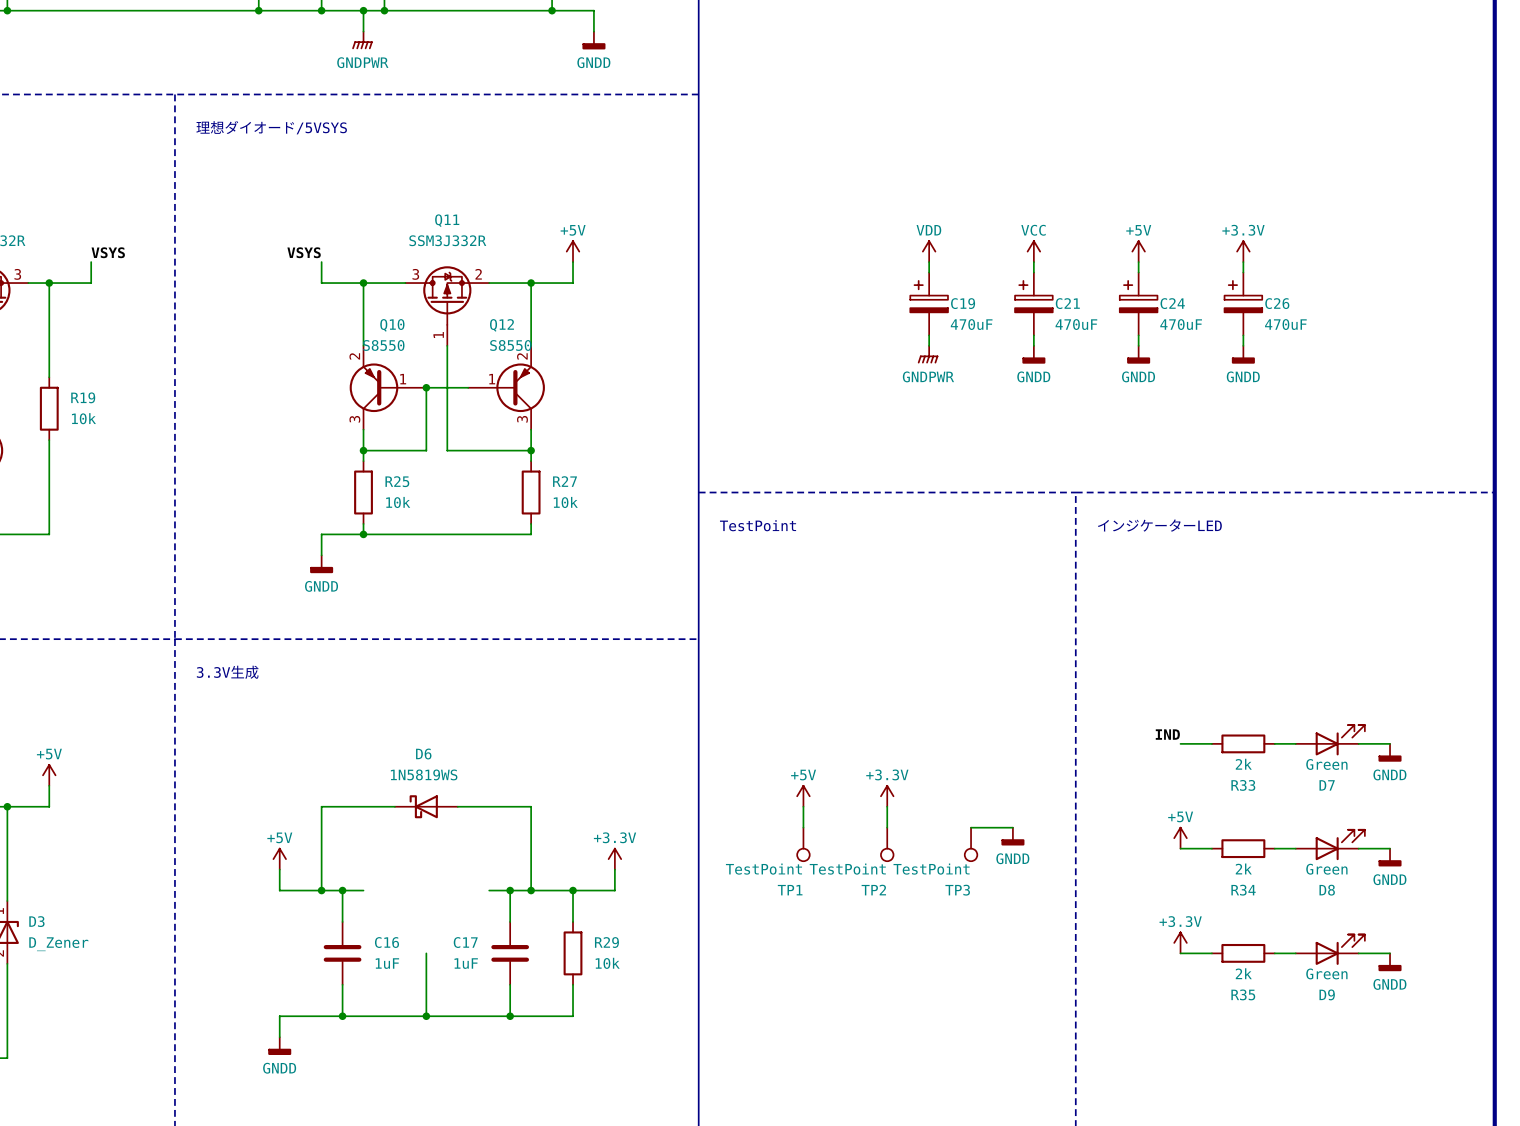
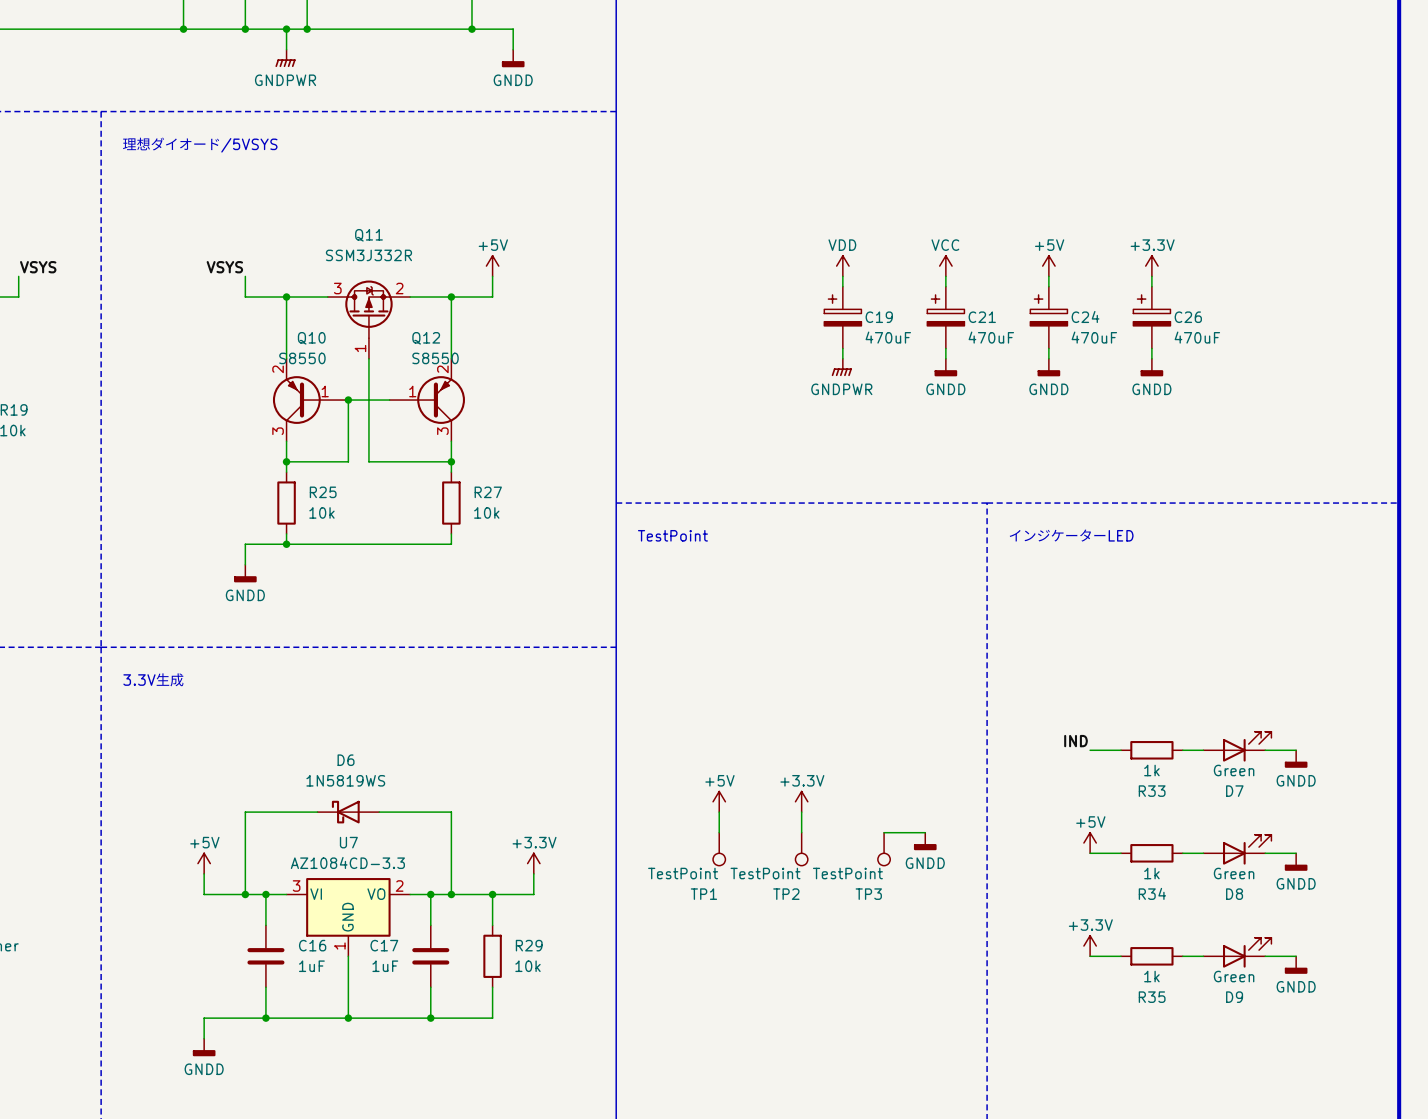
R33 value: 2k (1243, 764) -> 1k (1151, 770)
R34 value: 2k (1243, 868) -> 1k (1151, 873)
U7: none -> AZ1084CD-3.3 (348, 917)
R35 value: 2k (1243, 973) -> 1k (1151, 976)

